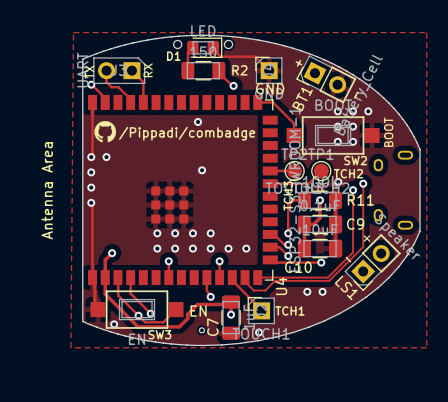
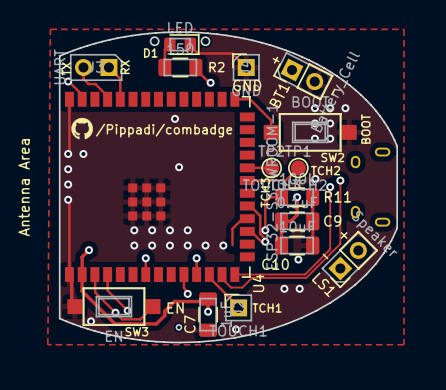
track: none -> (247, 205) (250, 205) (260, 215) (260, 233) (264, 237)
track: none -> (247, 218) (242, 218) (232, 228) (232, 245)
track: (270, 247) (279, 247) (288, 256) -> none
via: (288, 256) -> none
track: (270, 259) (272, 262) (321, 262) -> none

